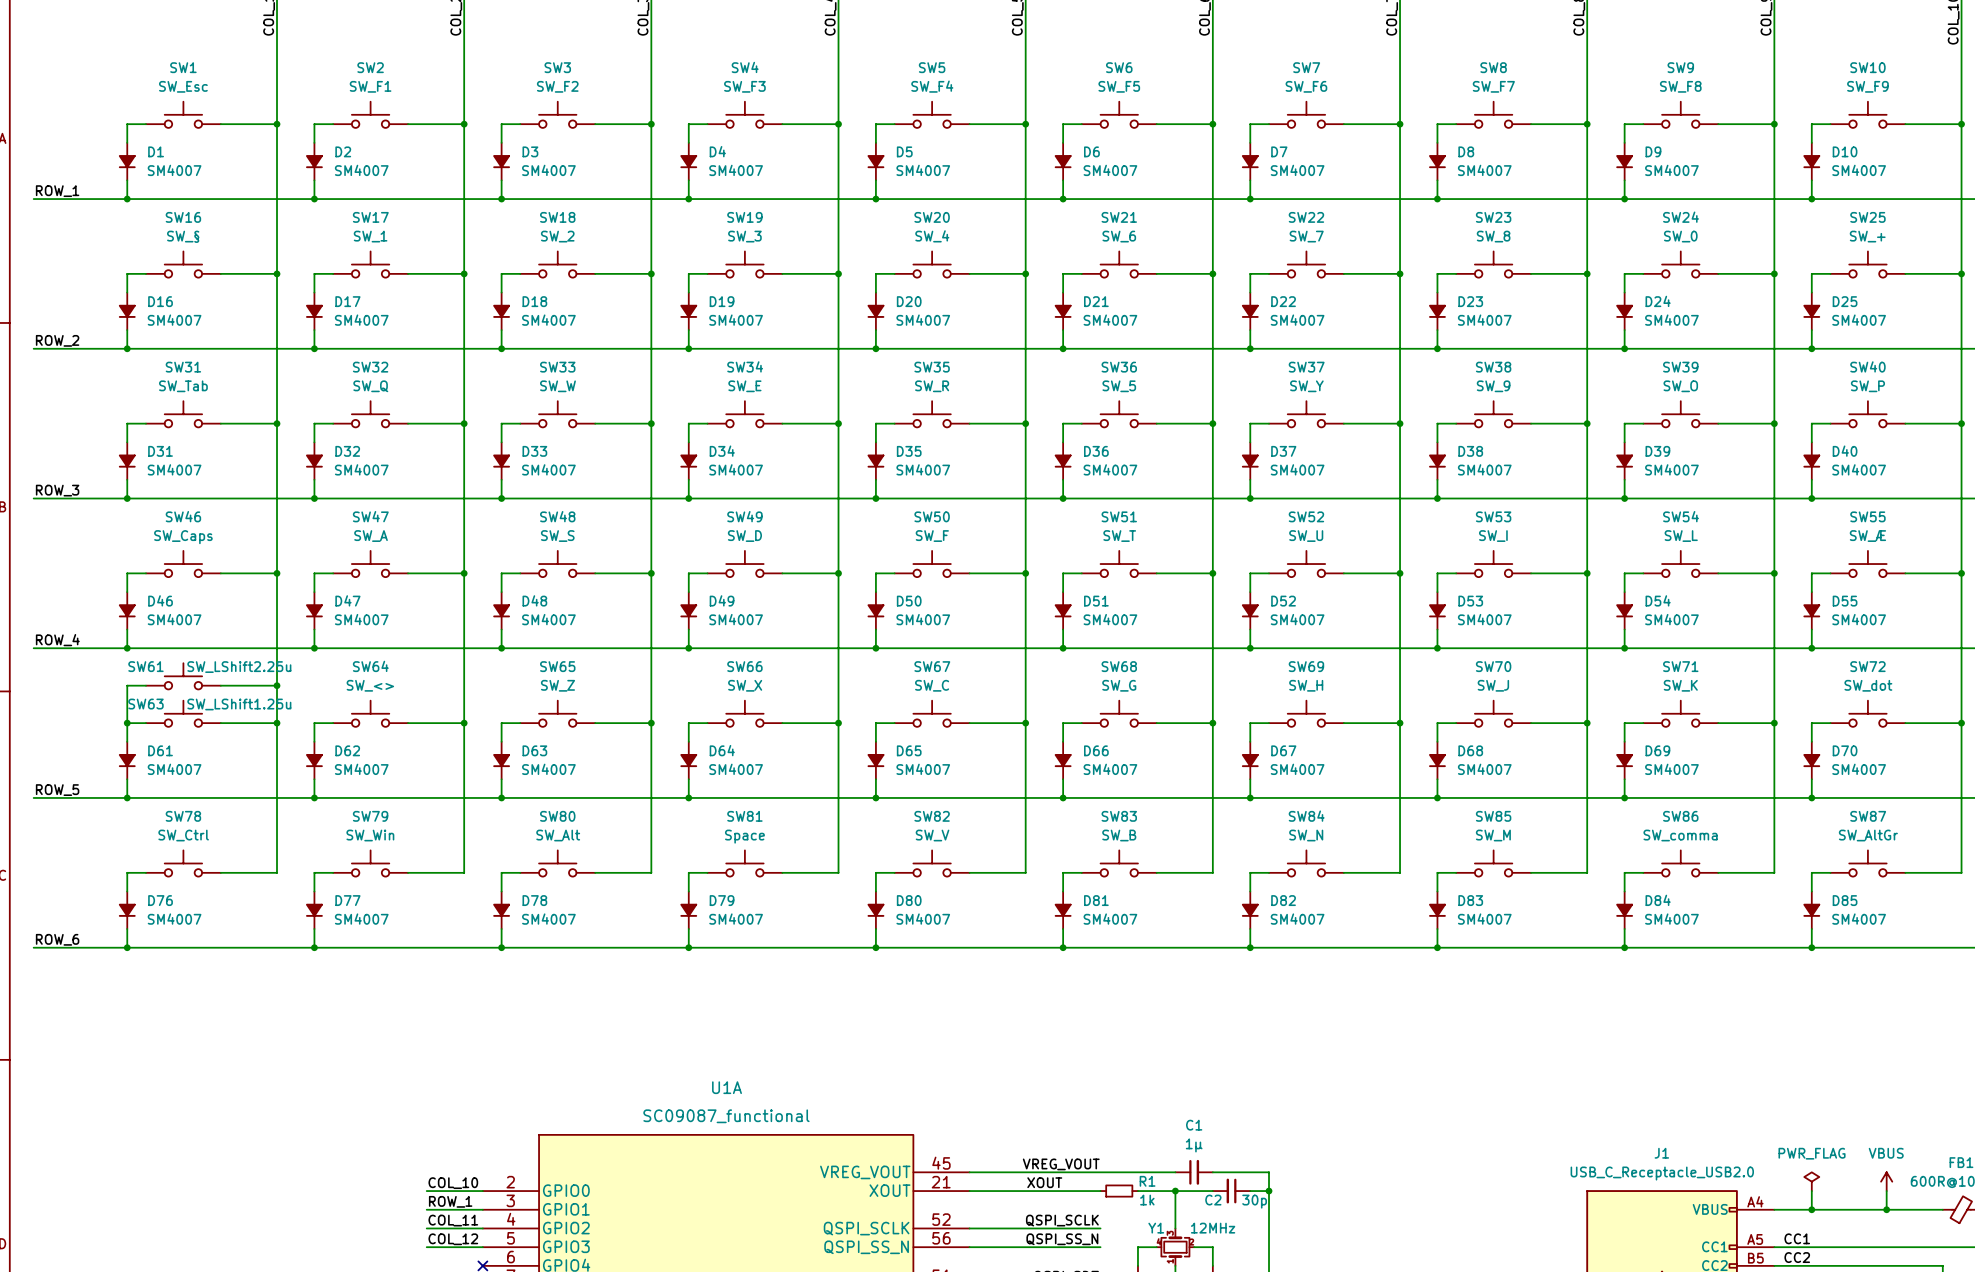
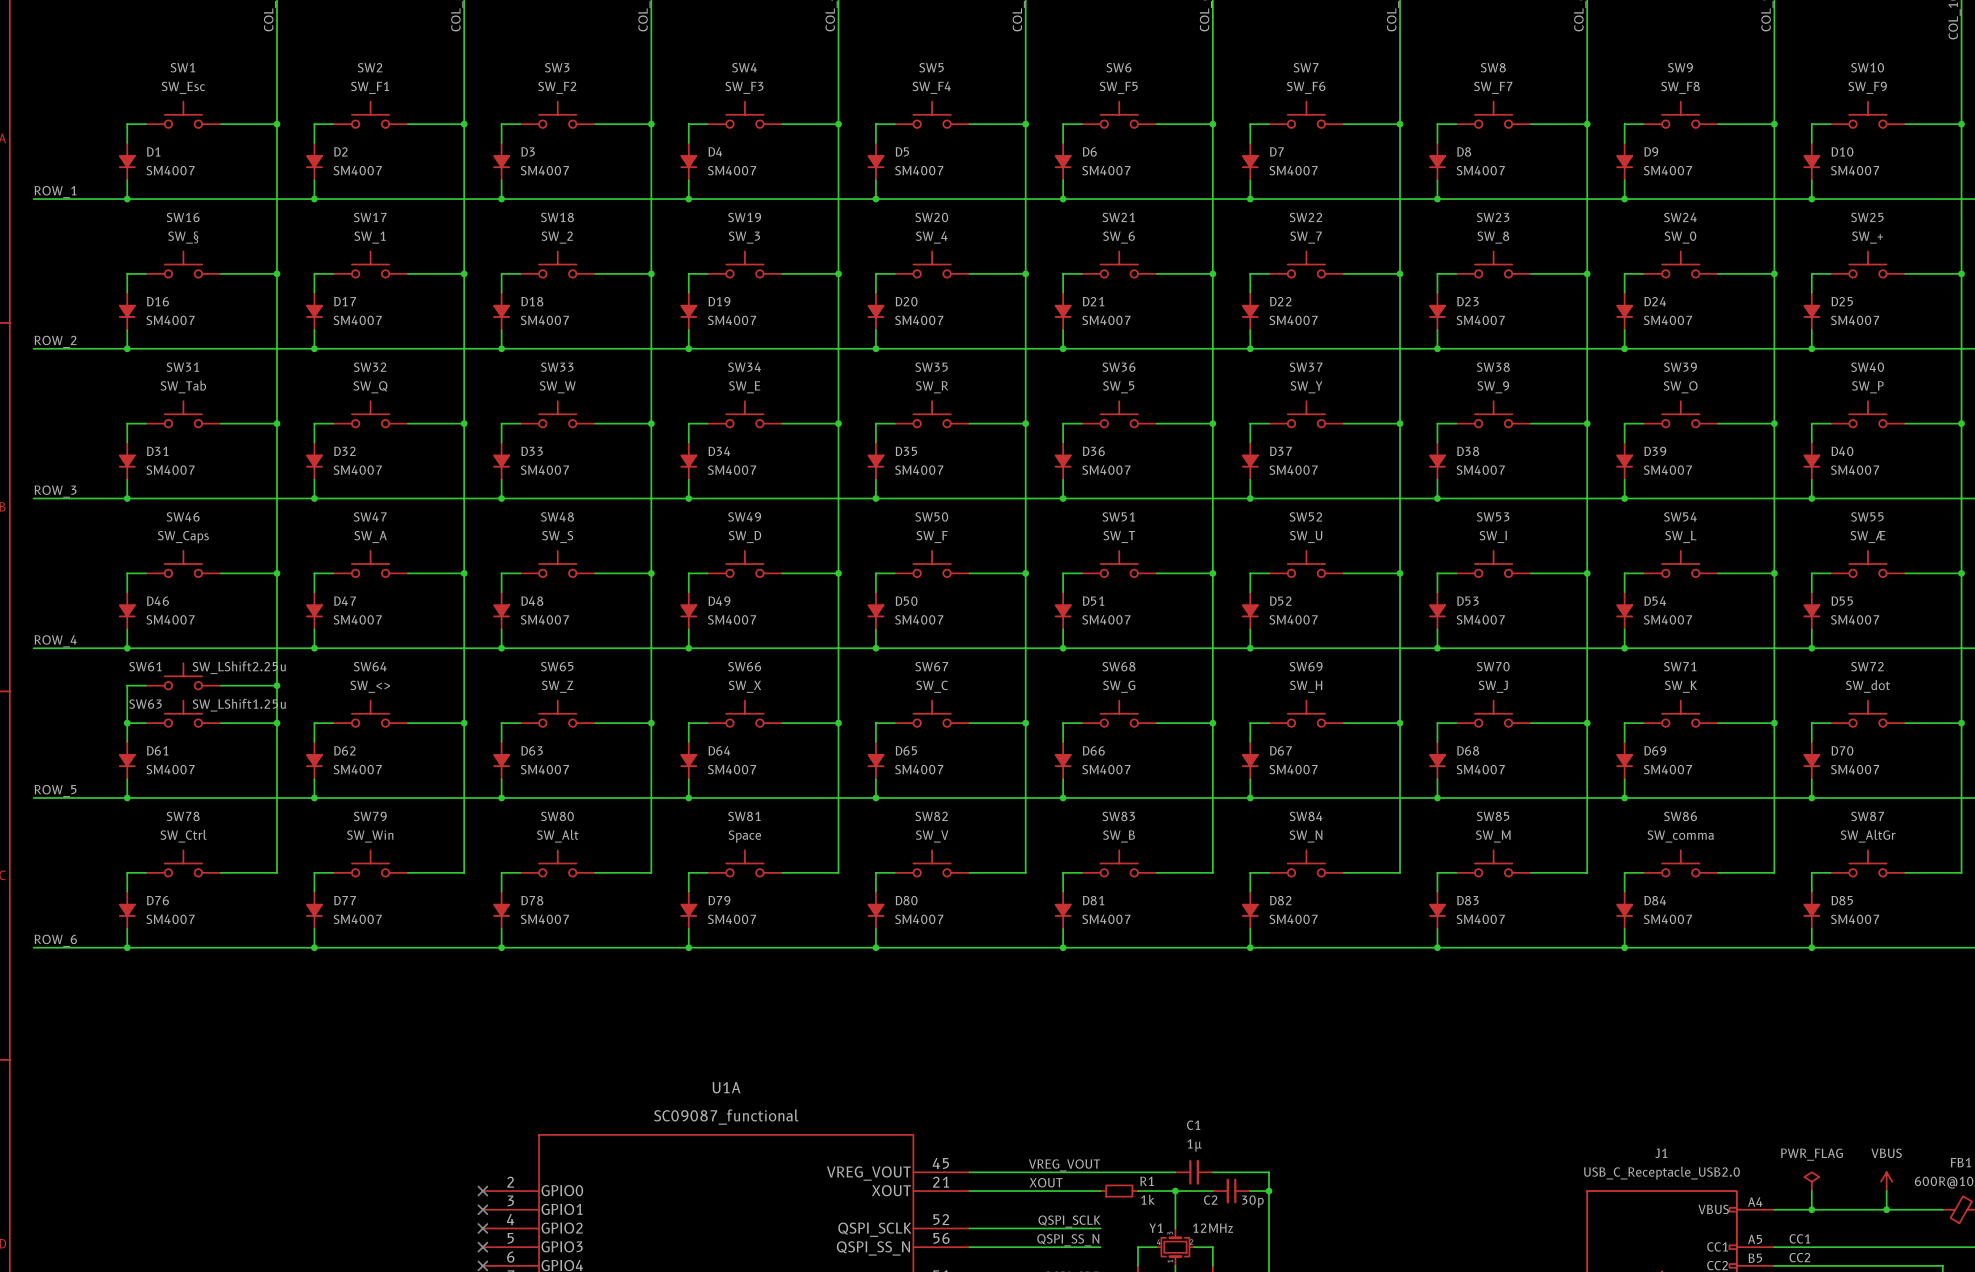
label: COL_10 (453, 1183) -> none
wire: (426, 1191) (482, 1191) -> none
no-connect mark: none -> (482, 1191)
label: ROW_1 (450, 1201) -> none
wire: (426, 1209) (482, 1209) -> none
no-connect mark: none -> (482, 1209)
label: COL_11 (453, 1220) -> none
wire: (426, 1228) (482, 1228) -> none
no-connect mark: none -> (482, 1228)
label: COL_12 (453, 1239) -> none
wire: (426, 1247) (482, 1247) -> none
no-connect mark: none -> (482, 1247)

